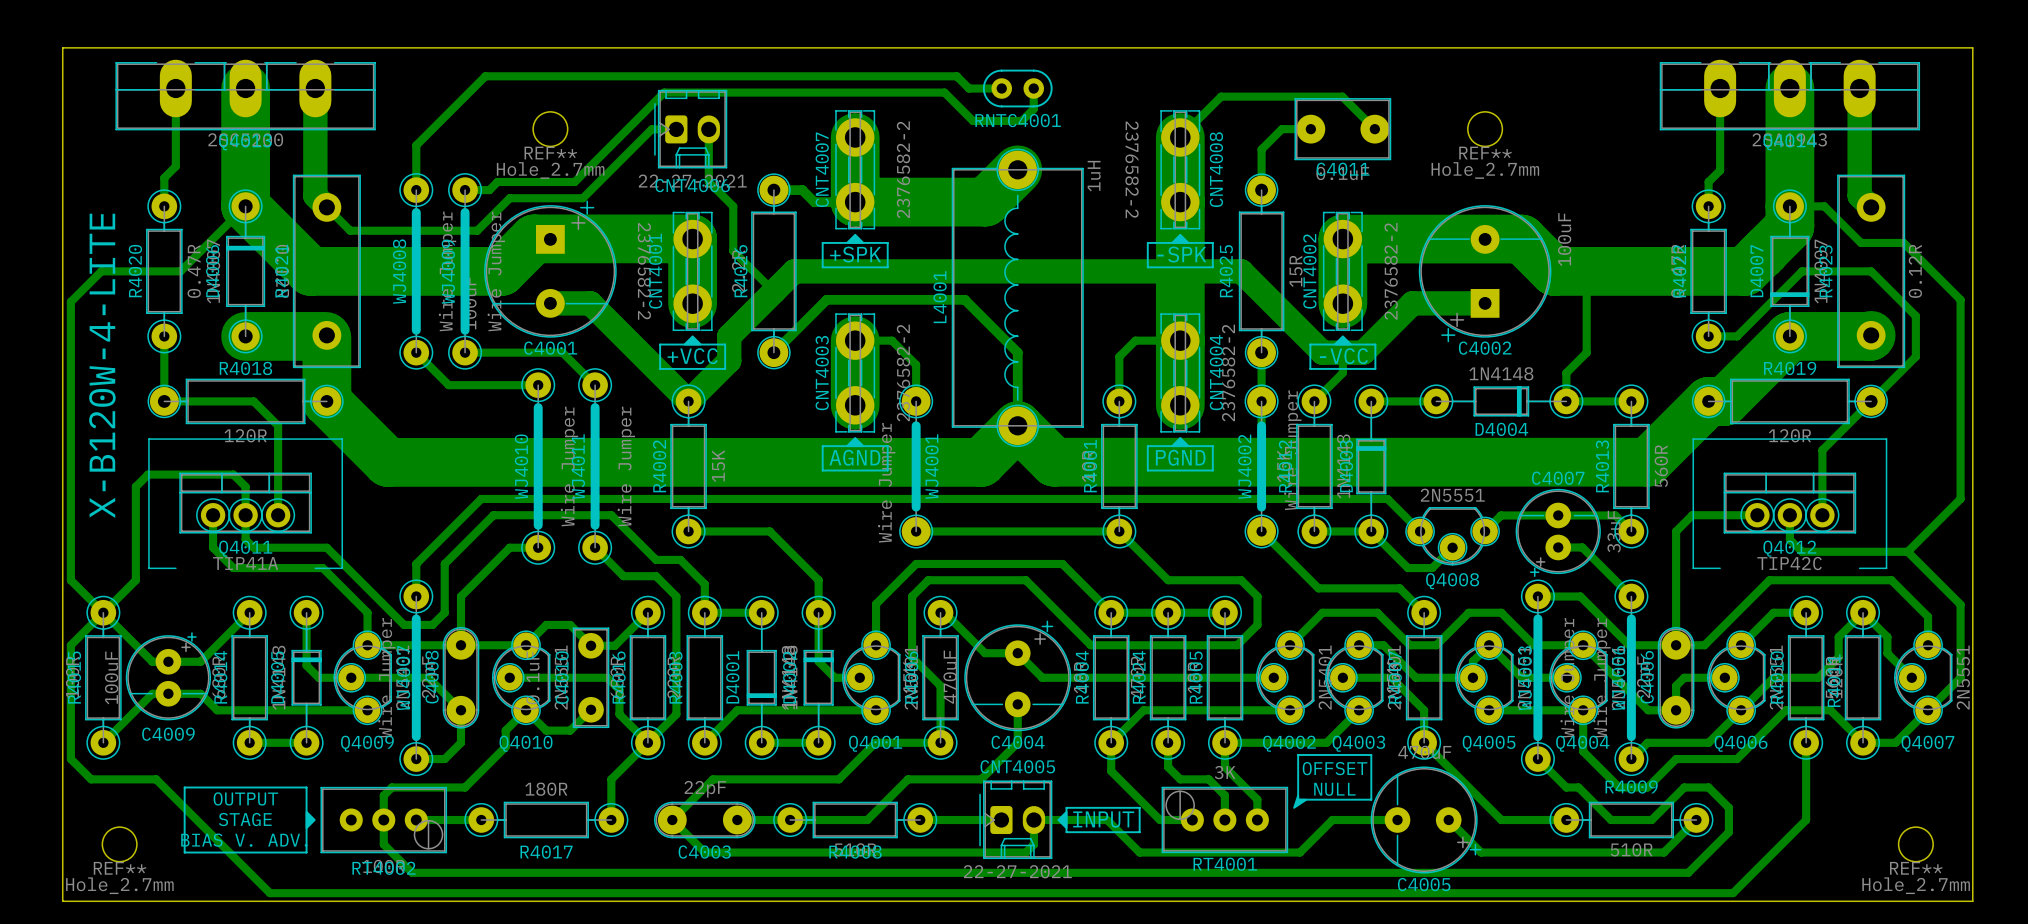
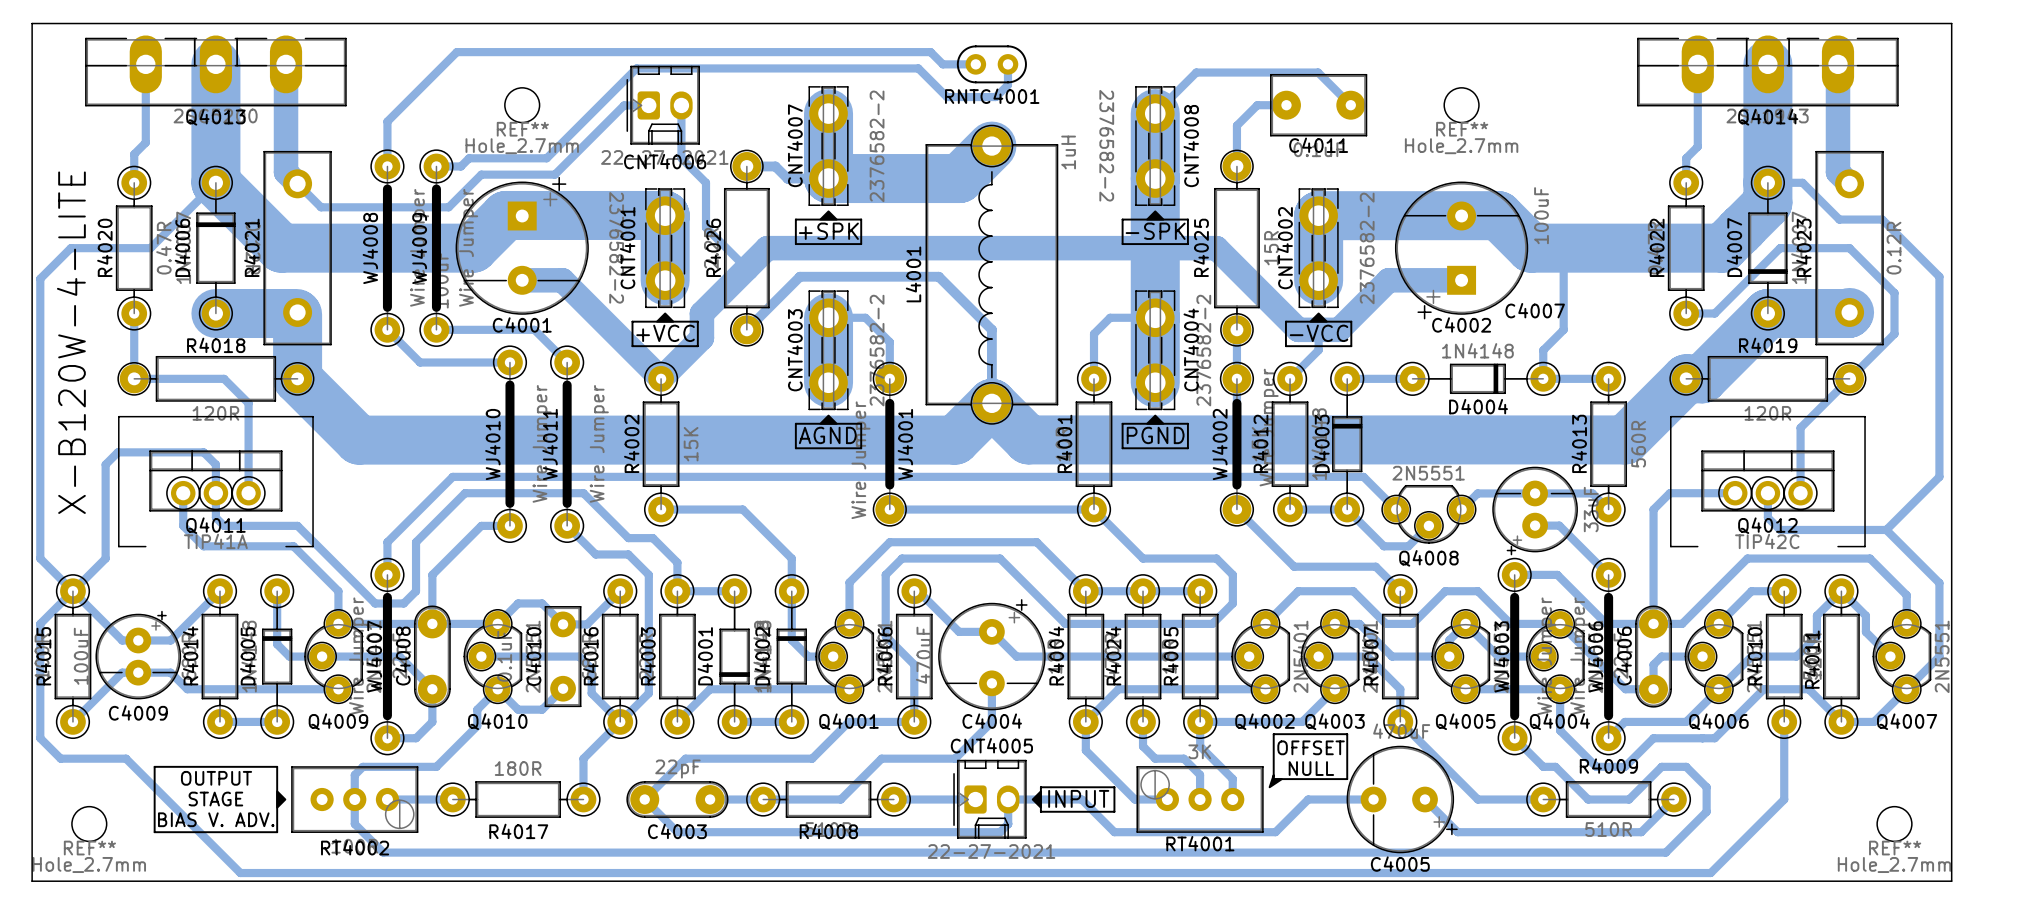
C4007 name position: C4007 (1558, 478) -> C4007 (1535, 310)

